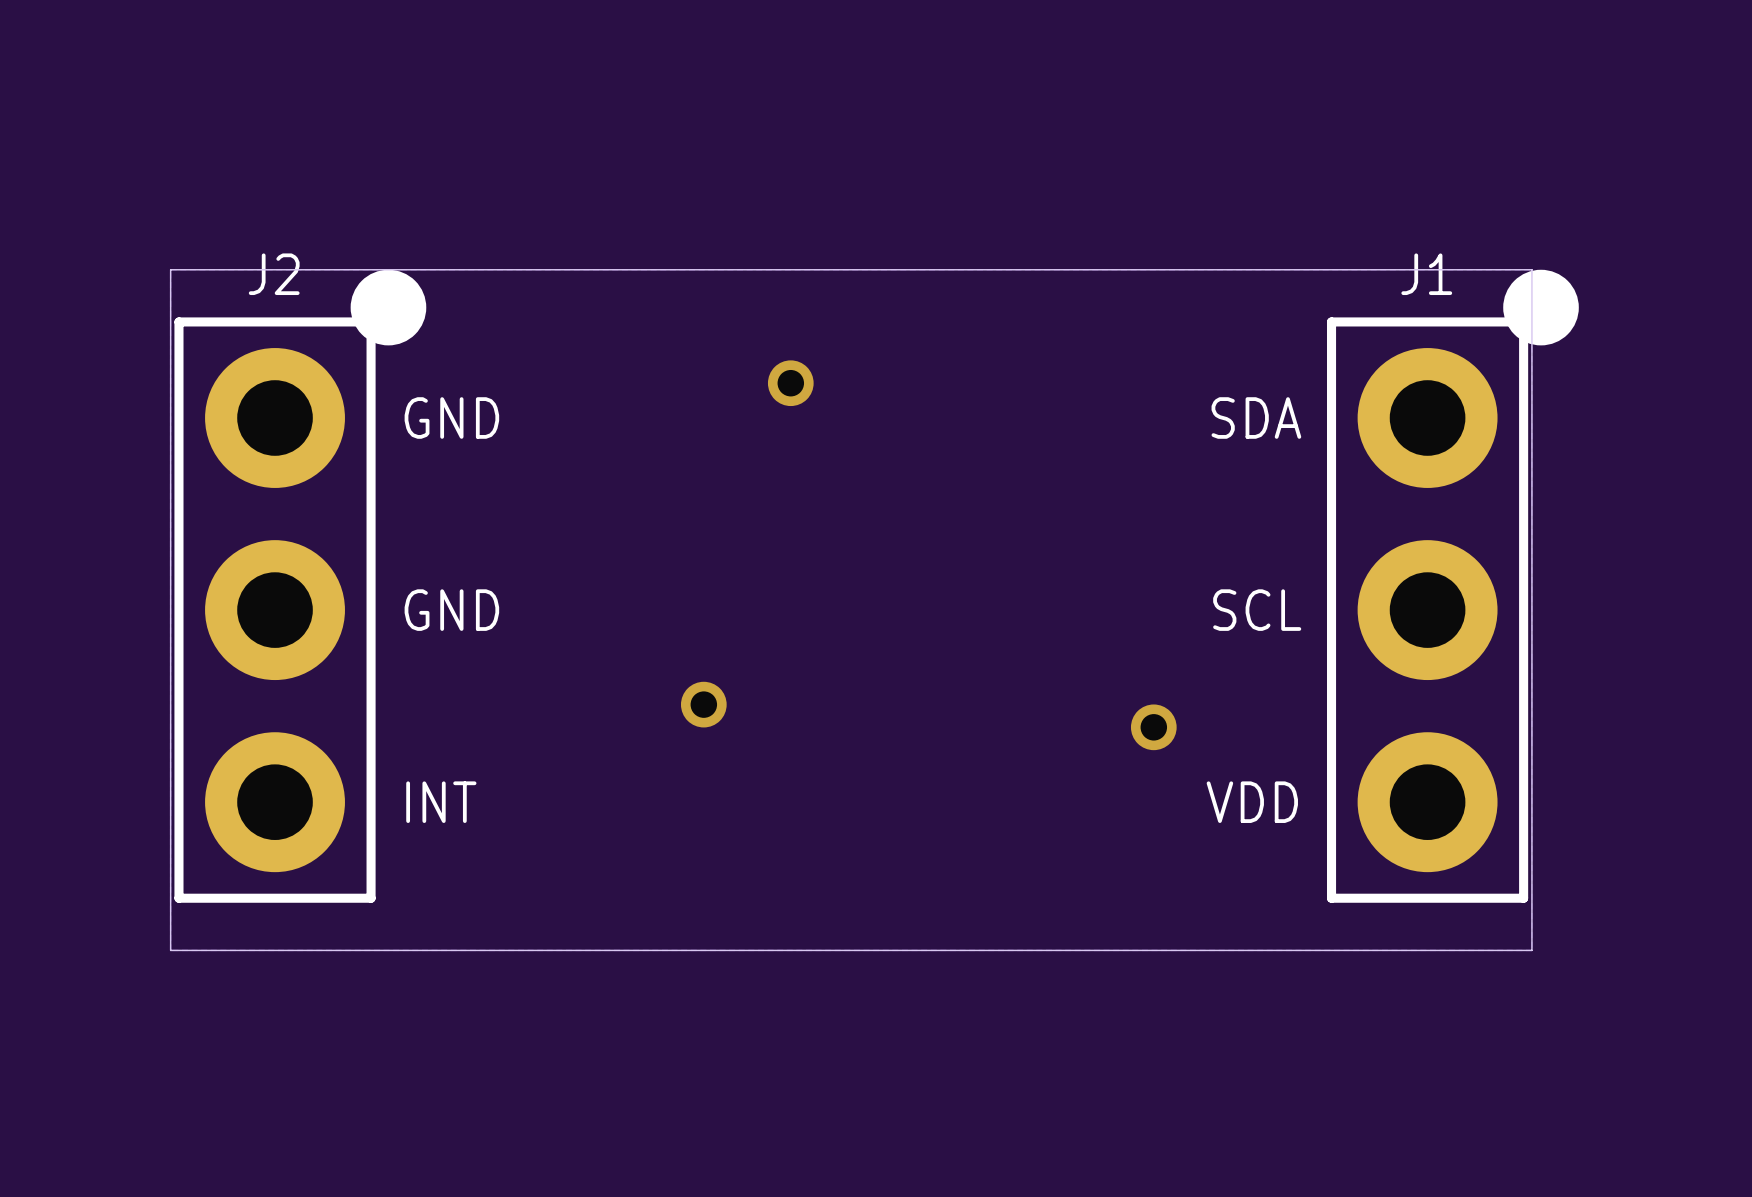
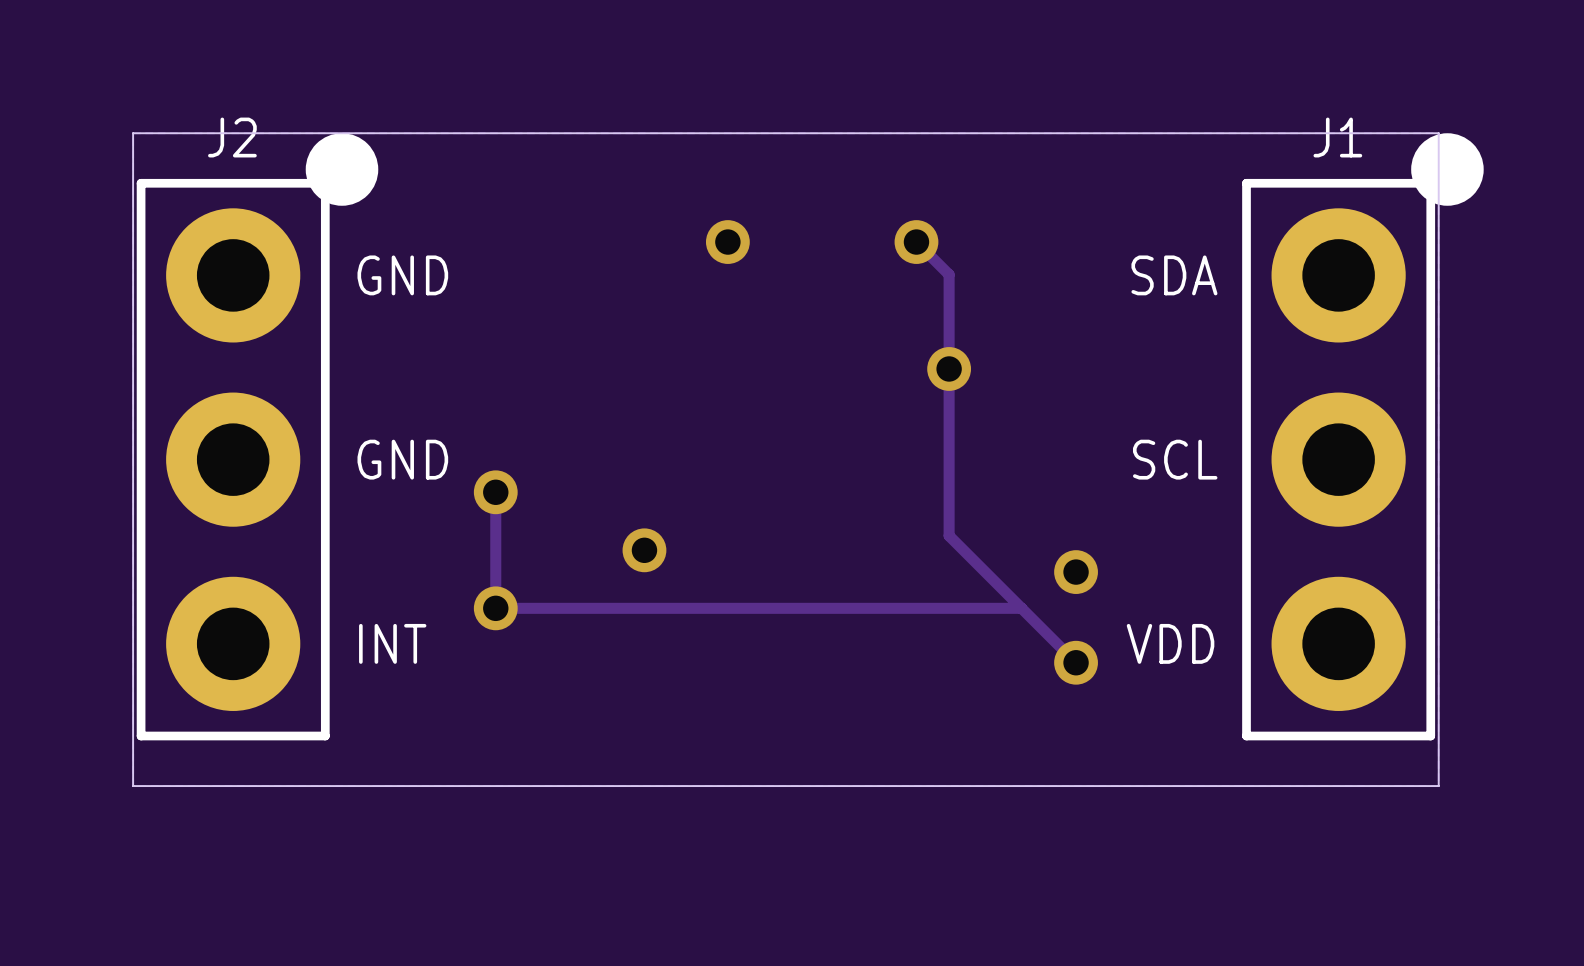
track: none -> (916, 242) (949, 274) (949, 535) (1076, 662)
via: none -> (916, 242)
via: none -> (949, 368)
track: none -> (495, 492) (495, 608) (1021, 608)
via: none -> (495, 492)
via: none -> (495, 608)
via: none -> (1076, 662)

